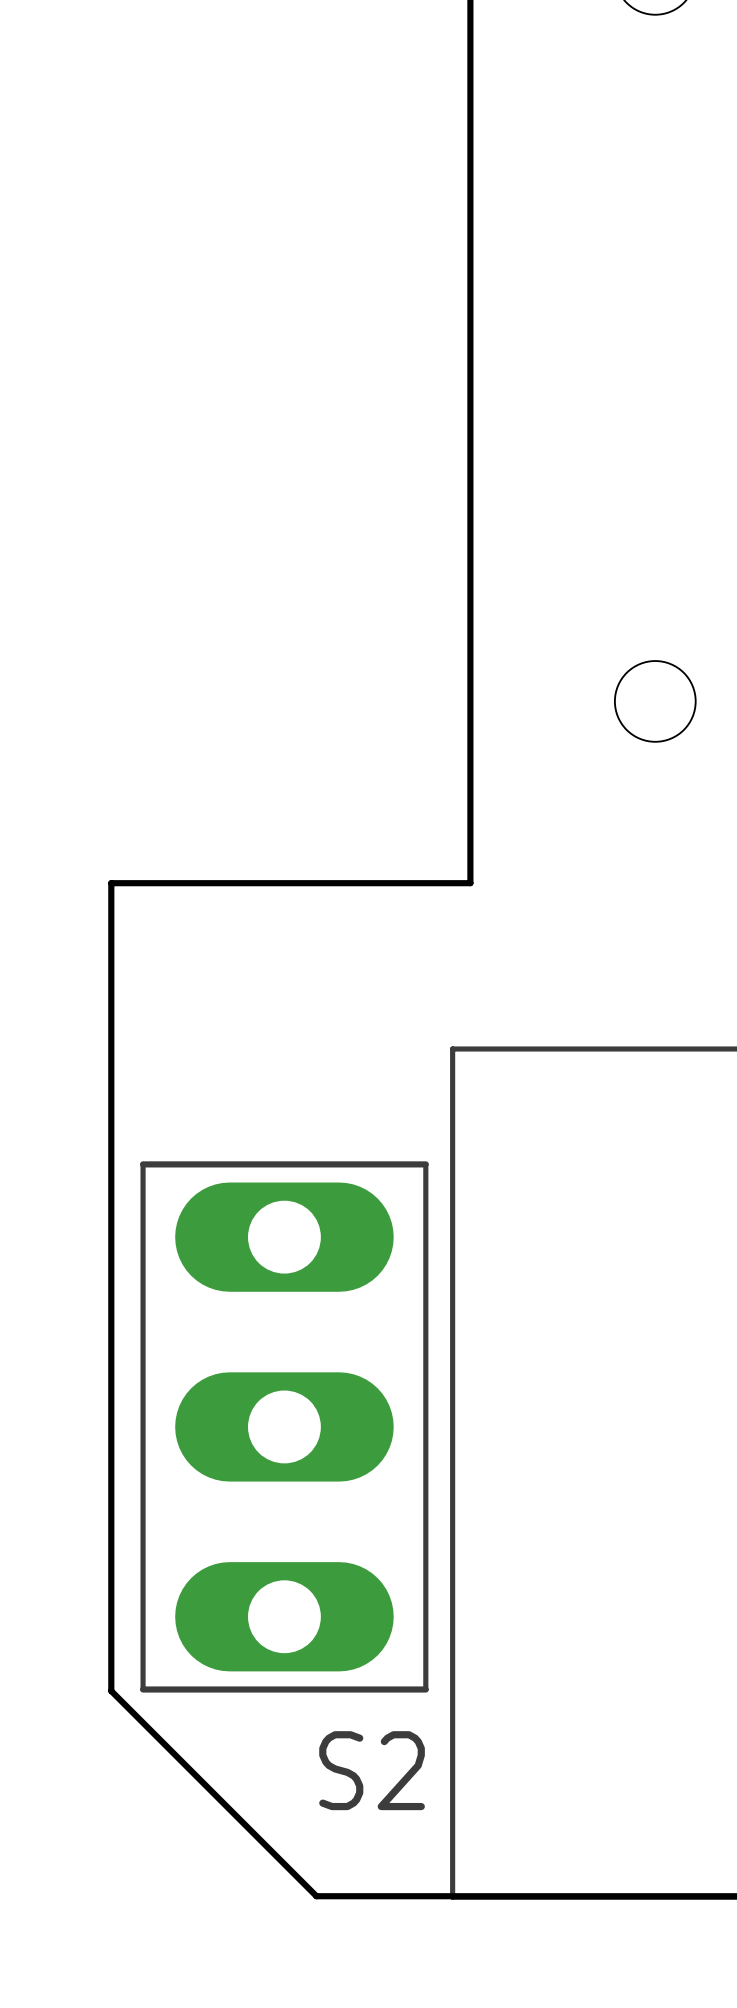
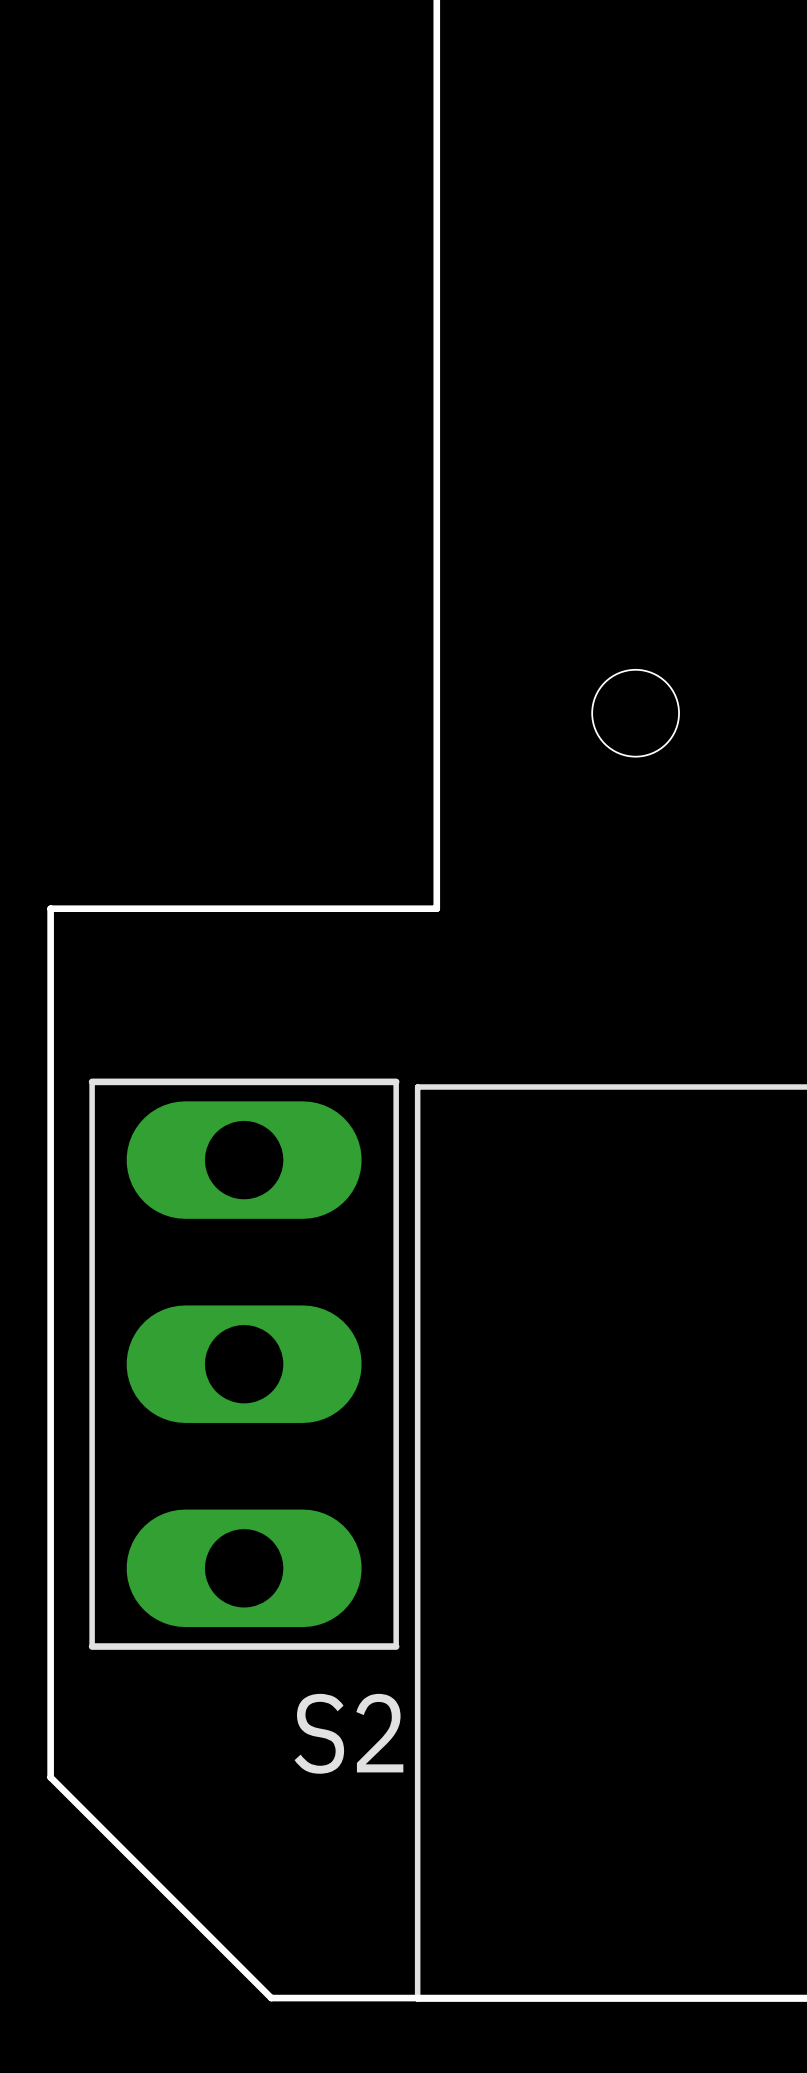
S2 position: (284, 1426) -> (244, 1364)

